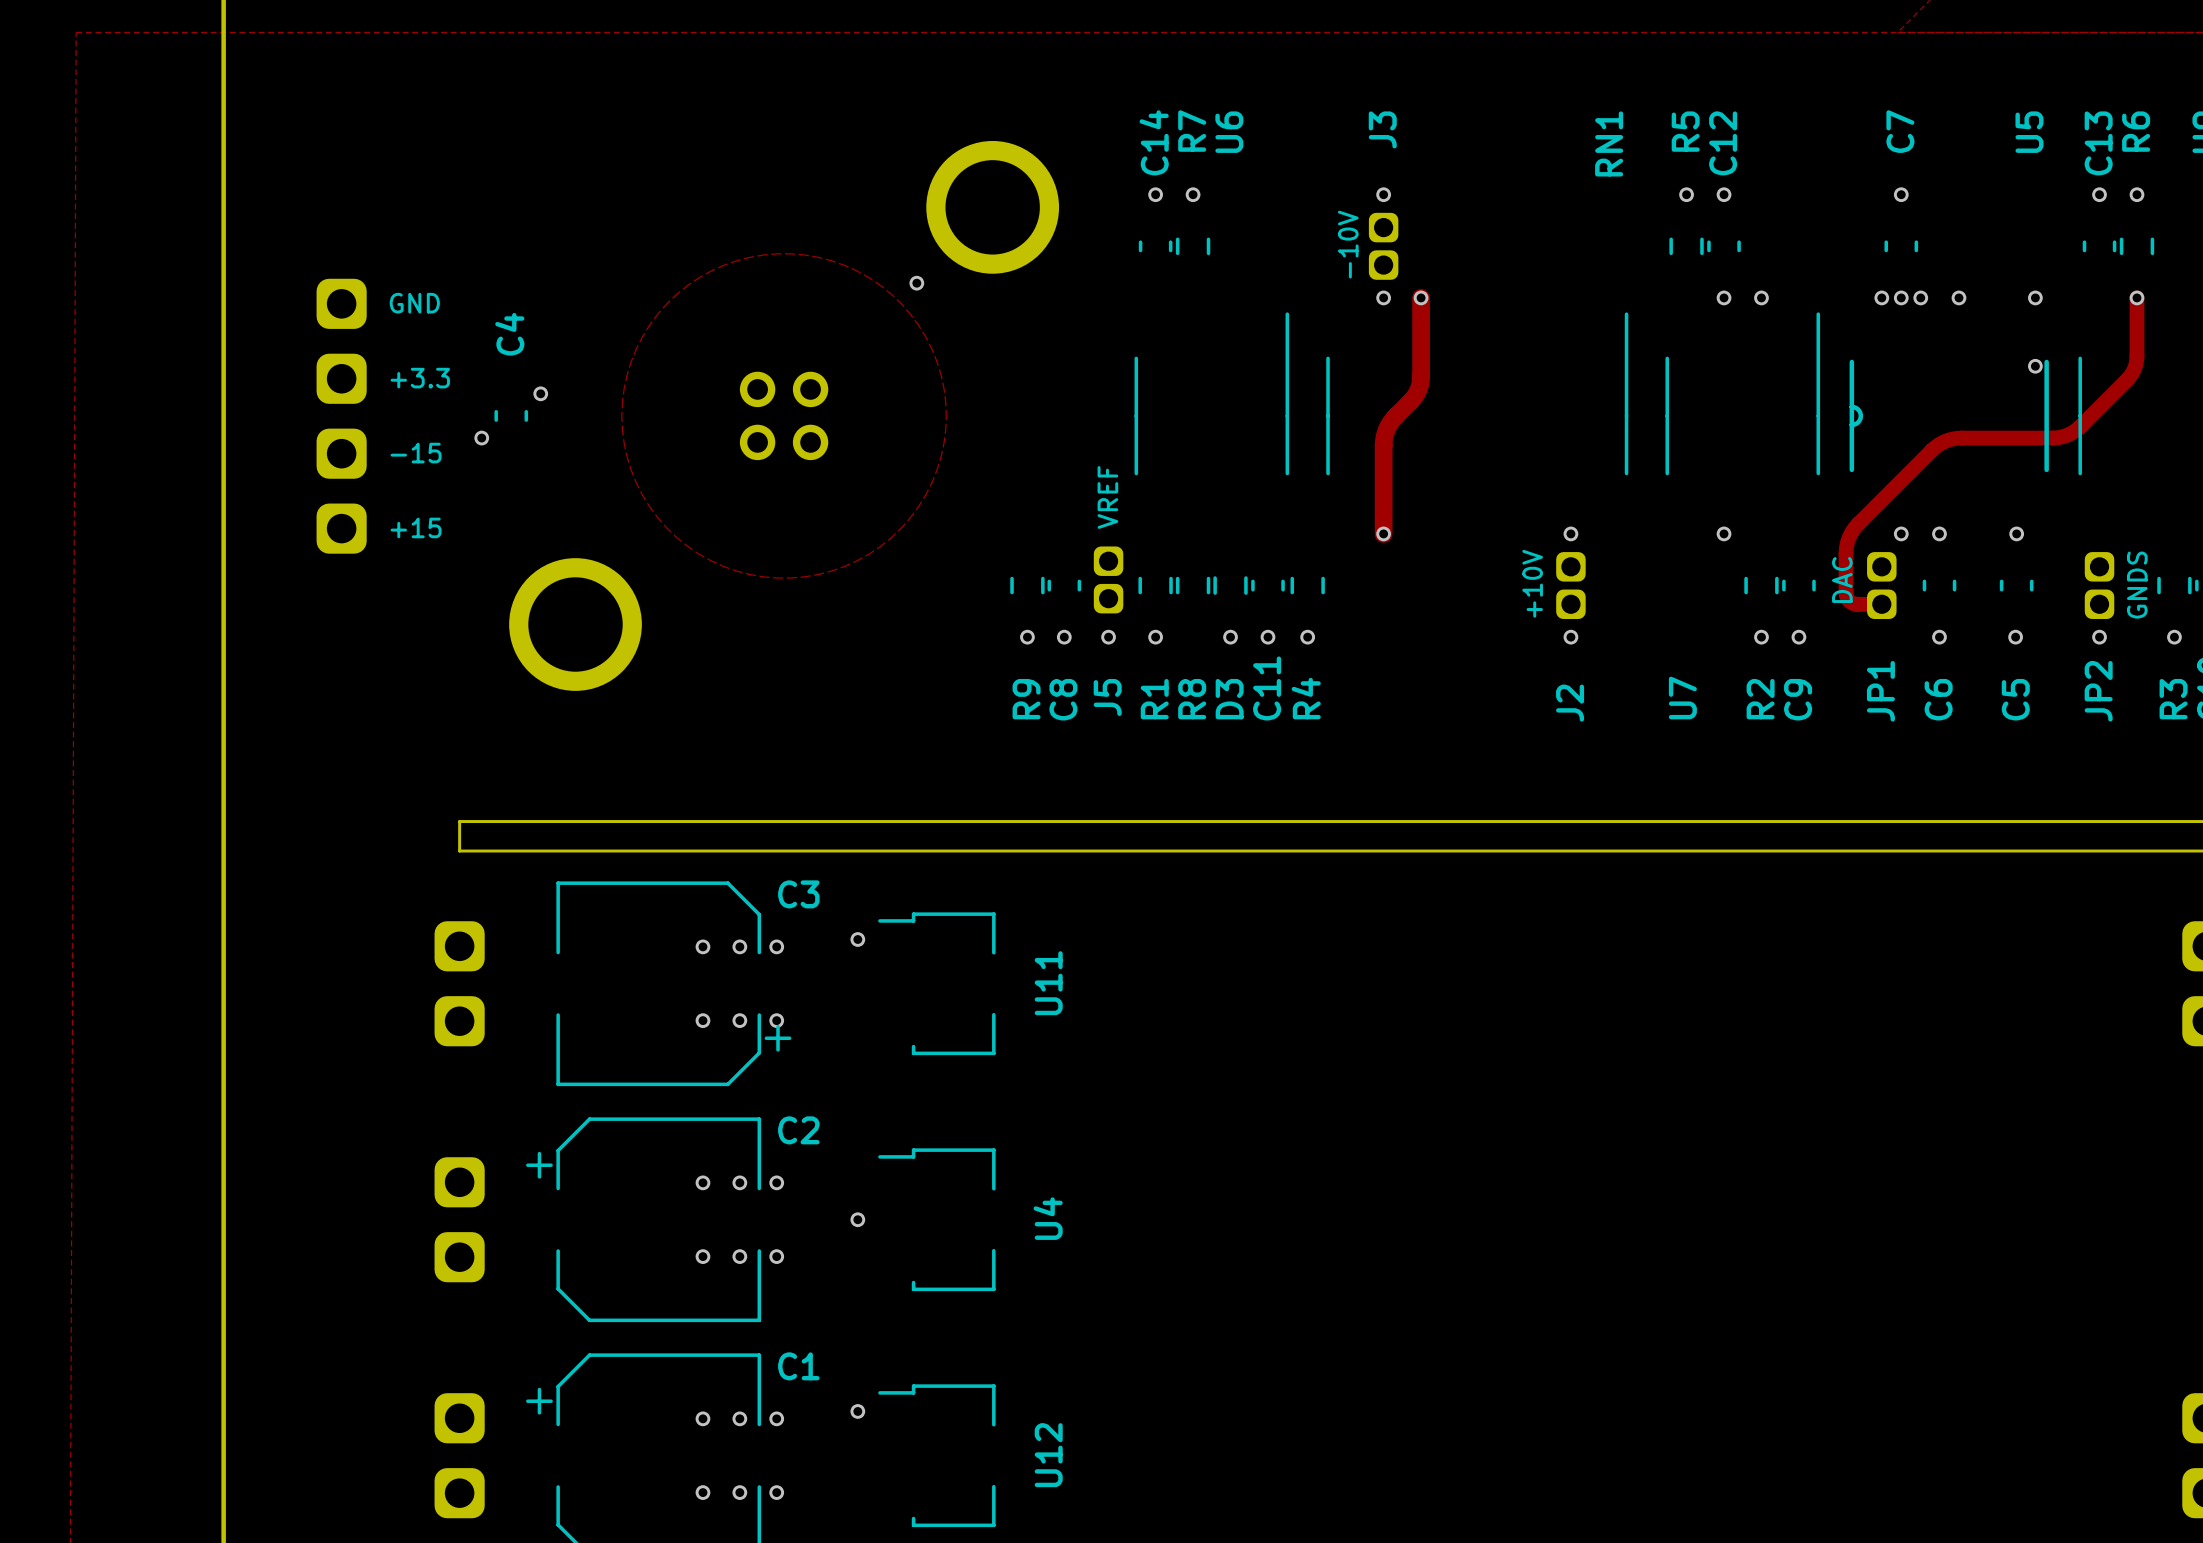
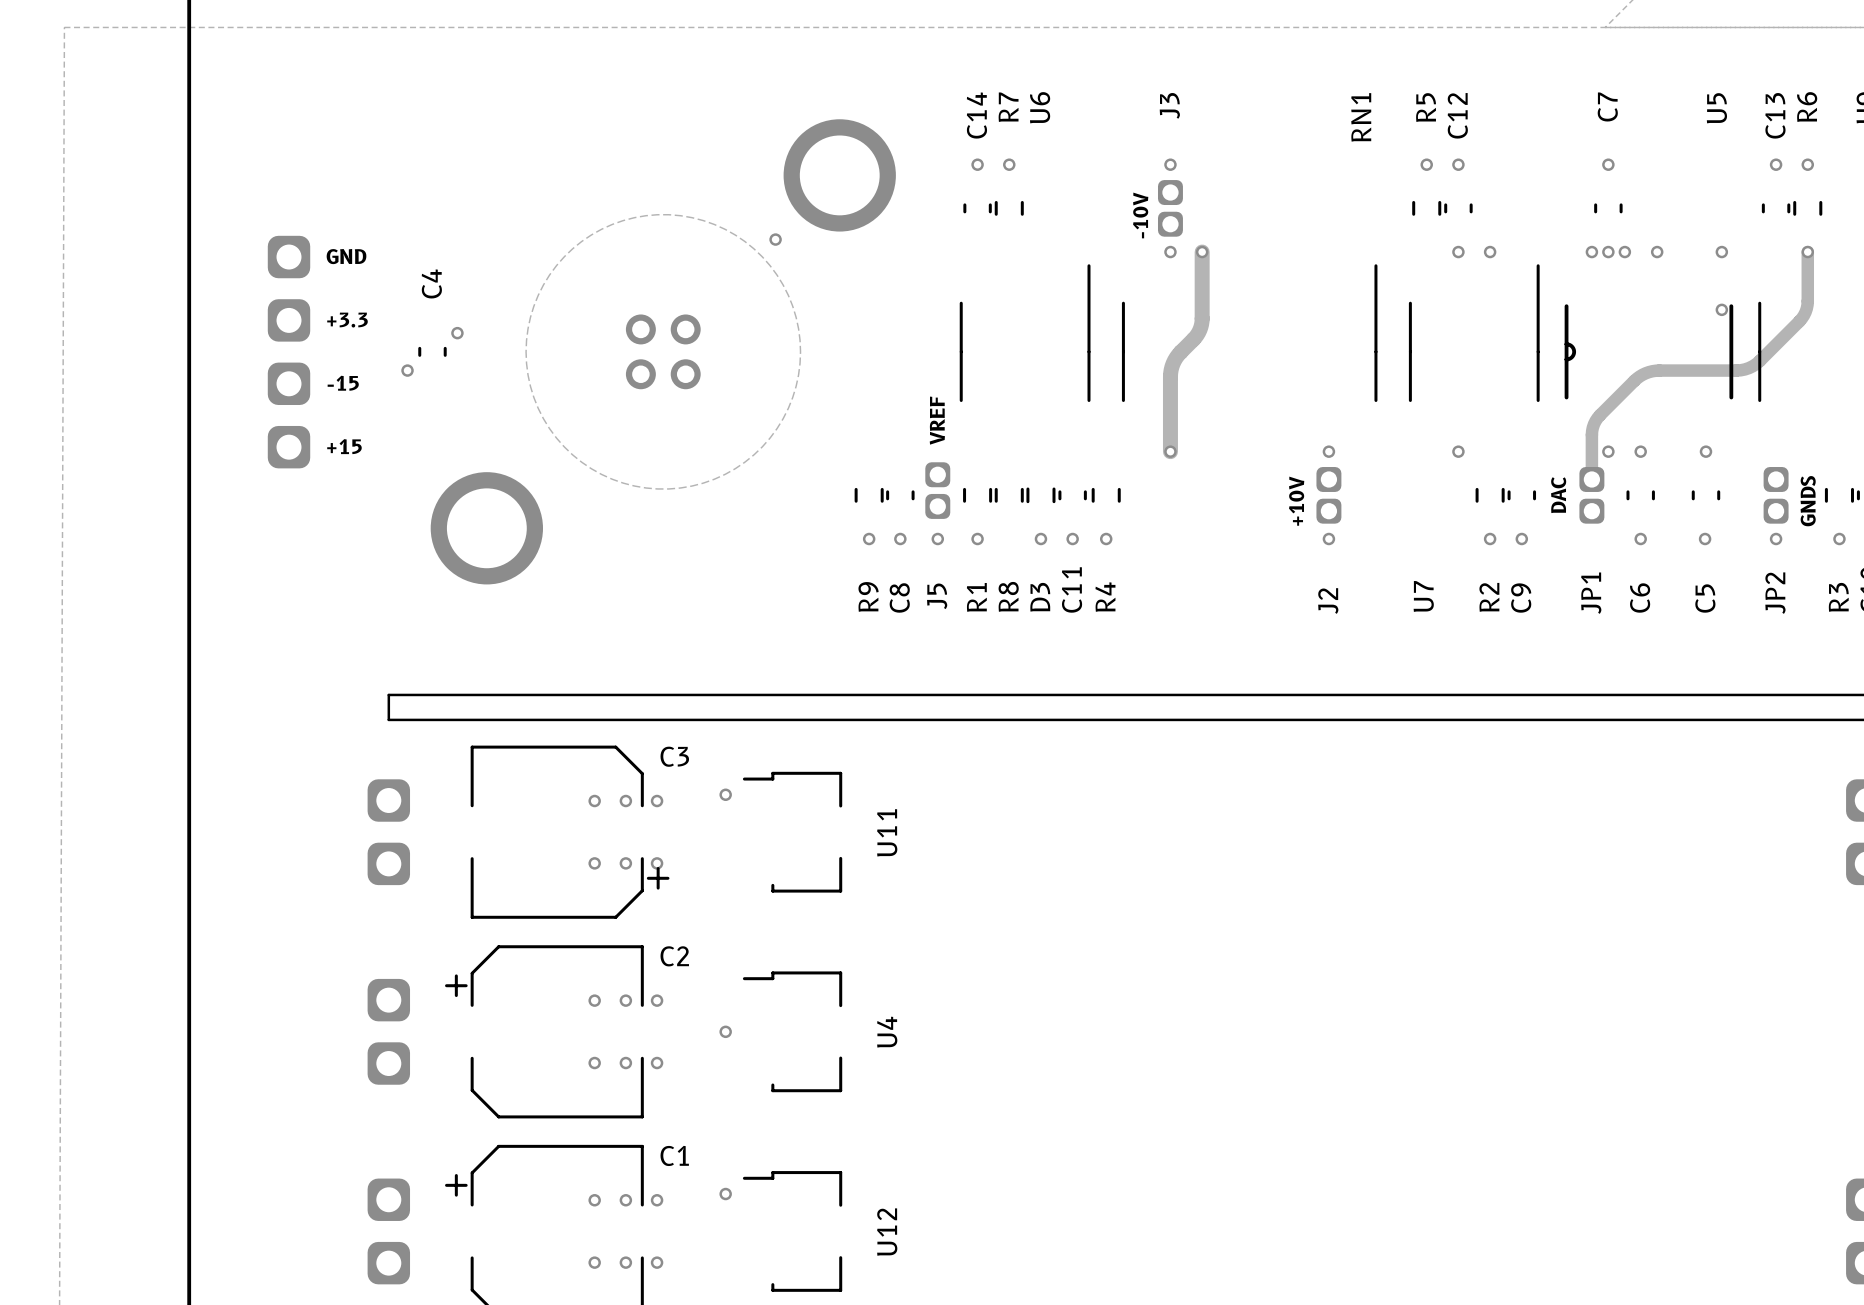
track: (1891, 490) (1854, 528) (1846, 548) (1847, 598) (1855, 604) (1881, 604) -> (1600, 415) (1592, 431) (1591, 479)

